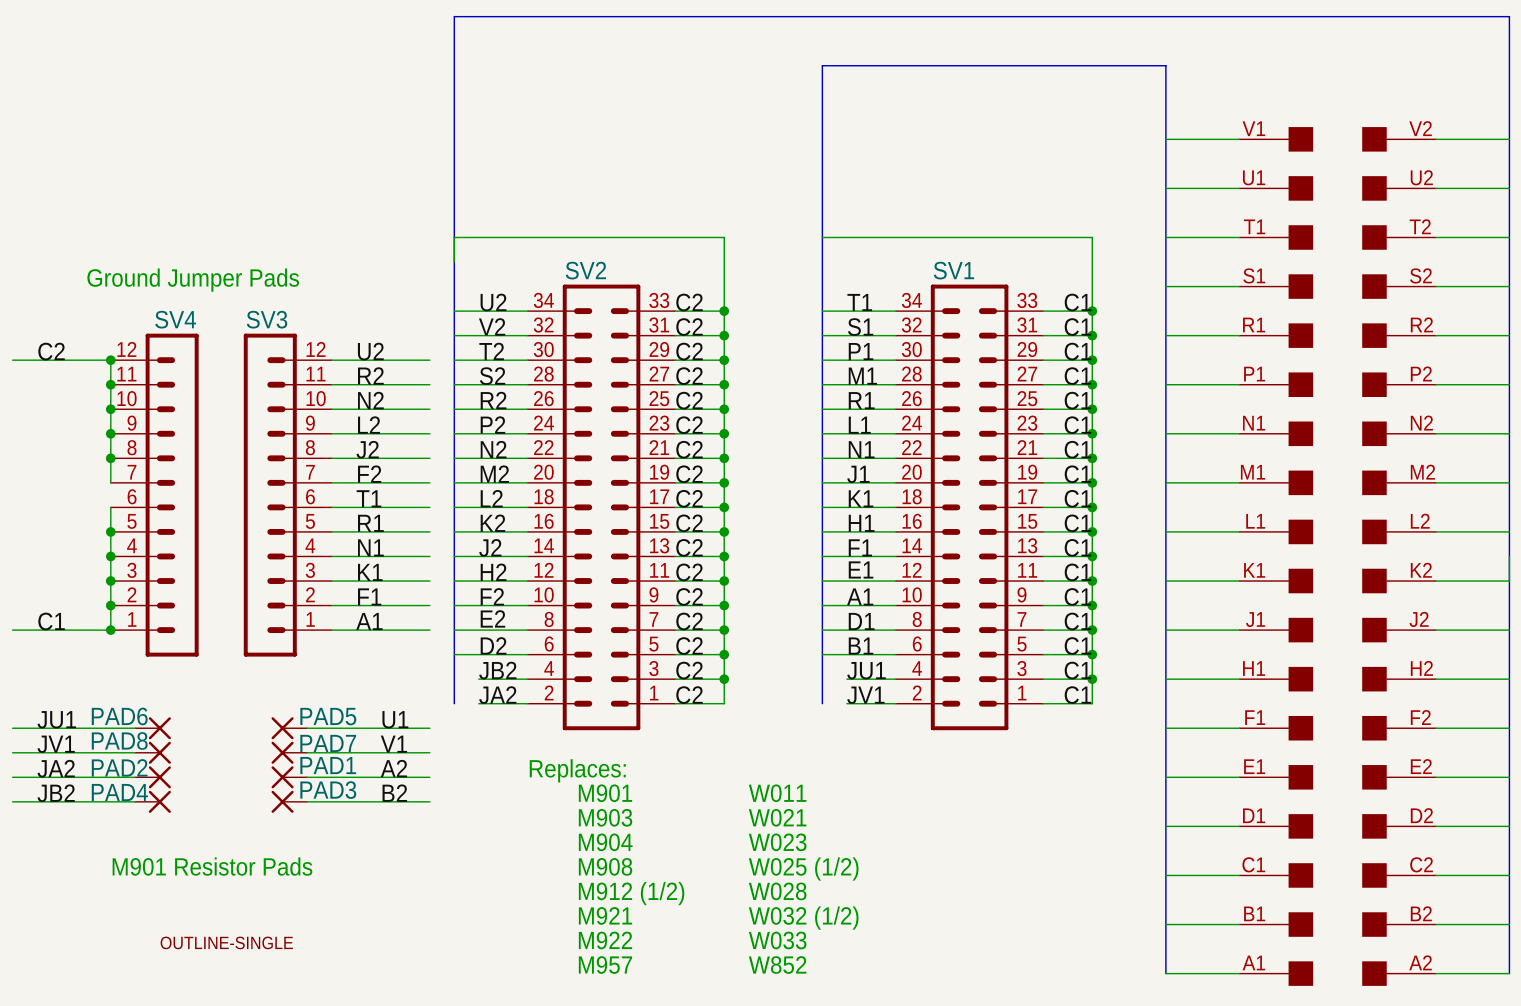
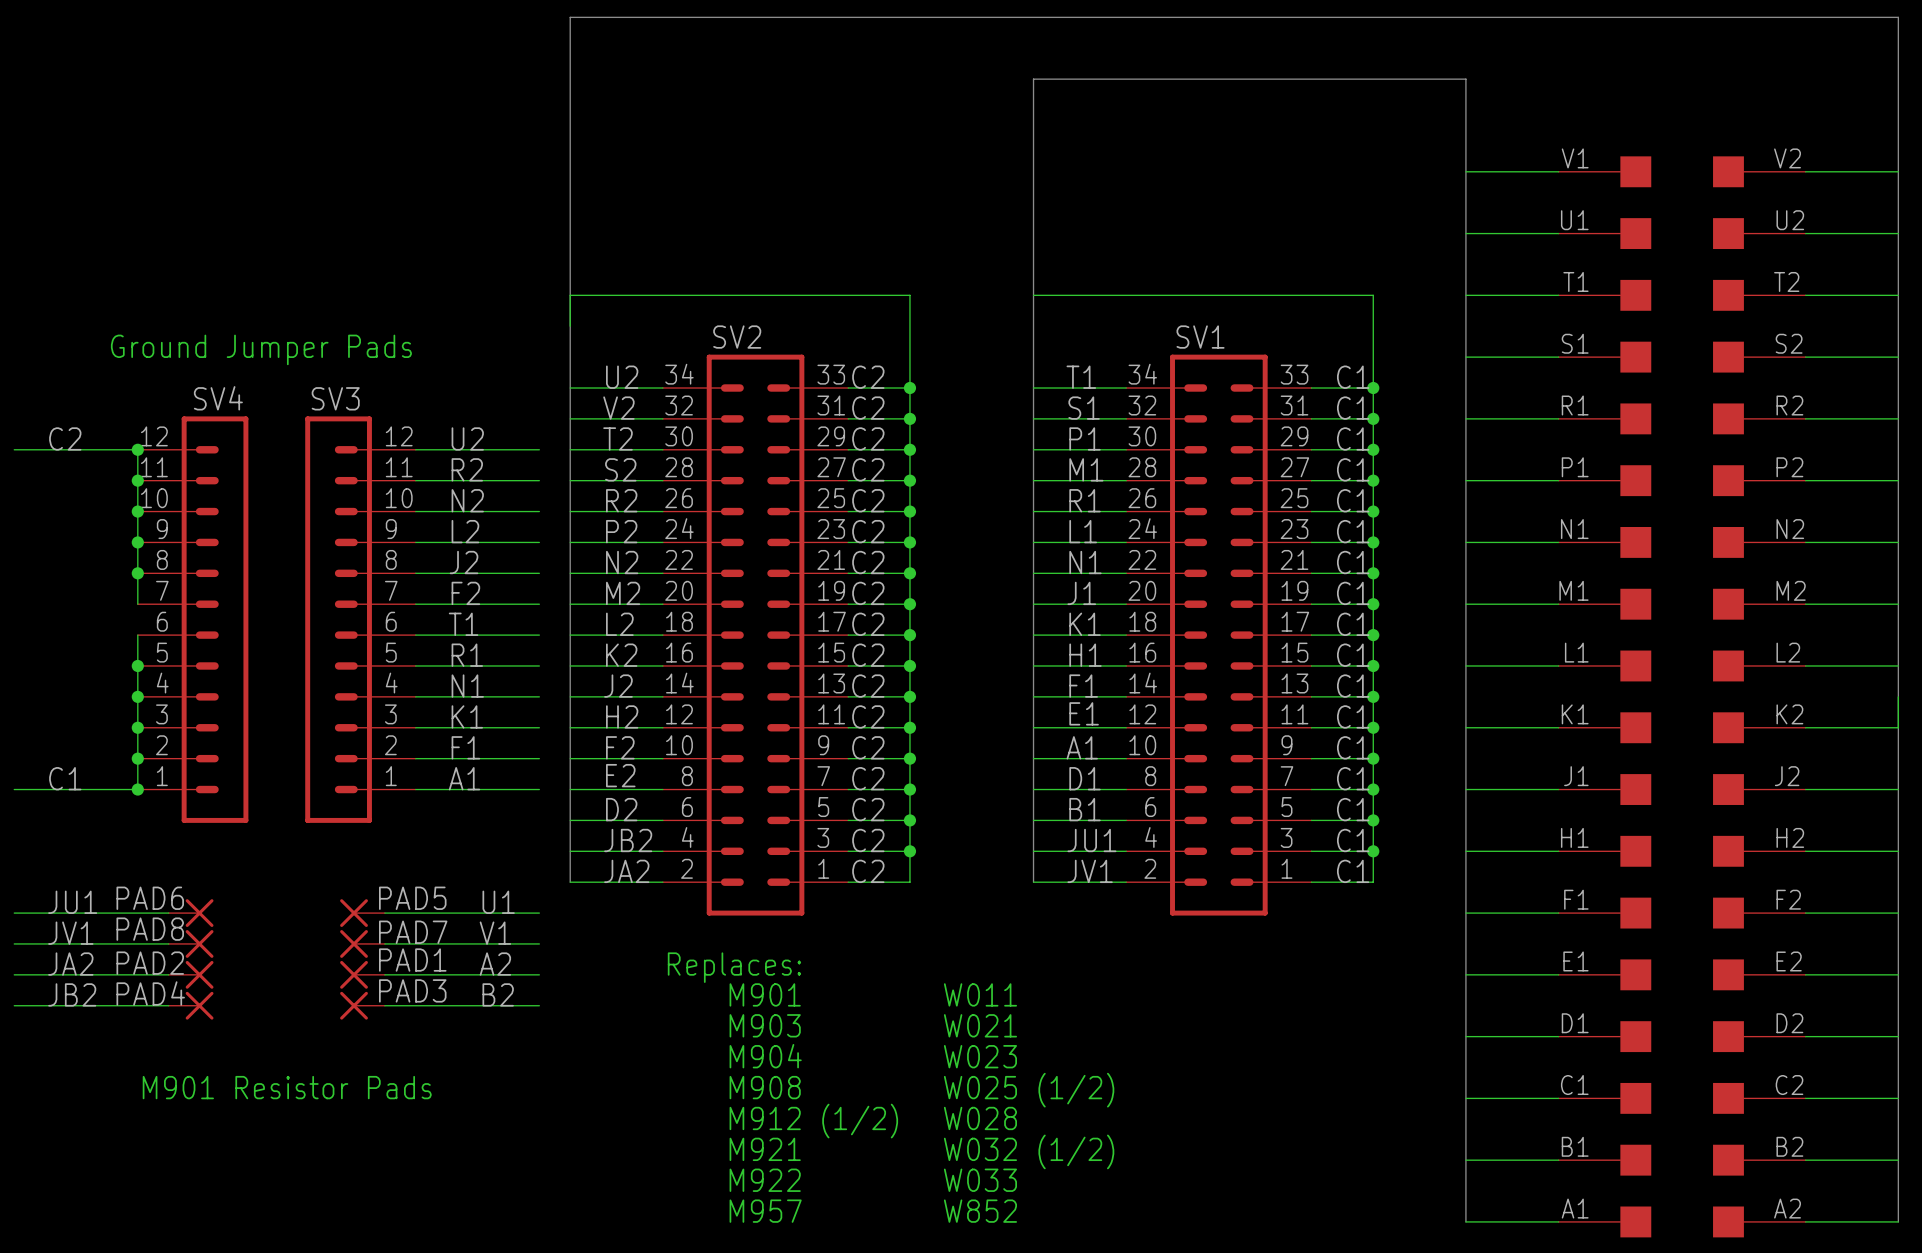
wire: none -> (570, 851) (601, 851)
wire: none -> (1033, 851) (1064, 851)
wire: none -> (570, 882) (601, 882)
wire: none -> (1033, 882) (1064, 882)
part: OUTLINE-SINGLE (226, 942) -> none

